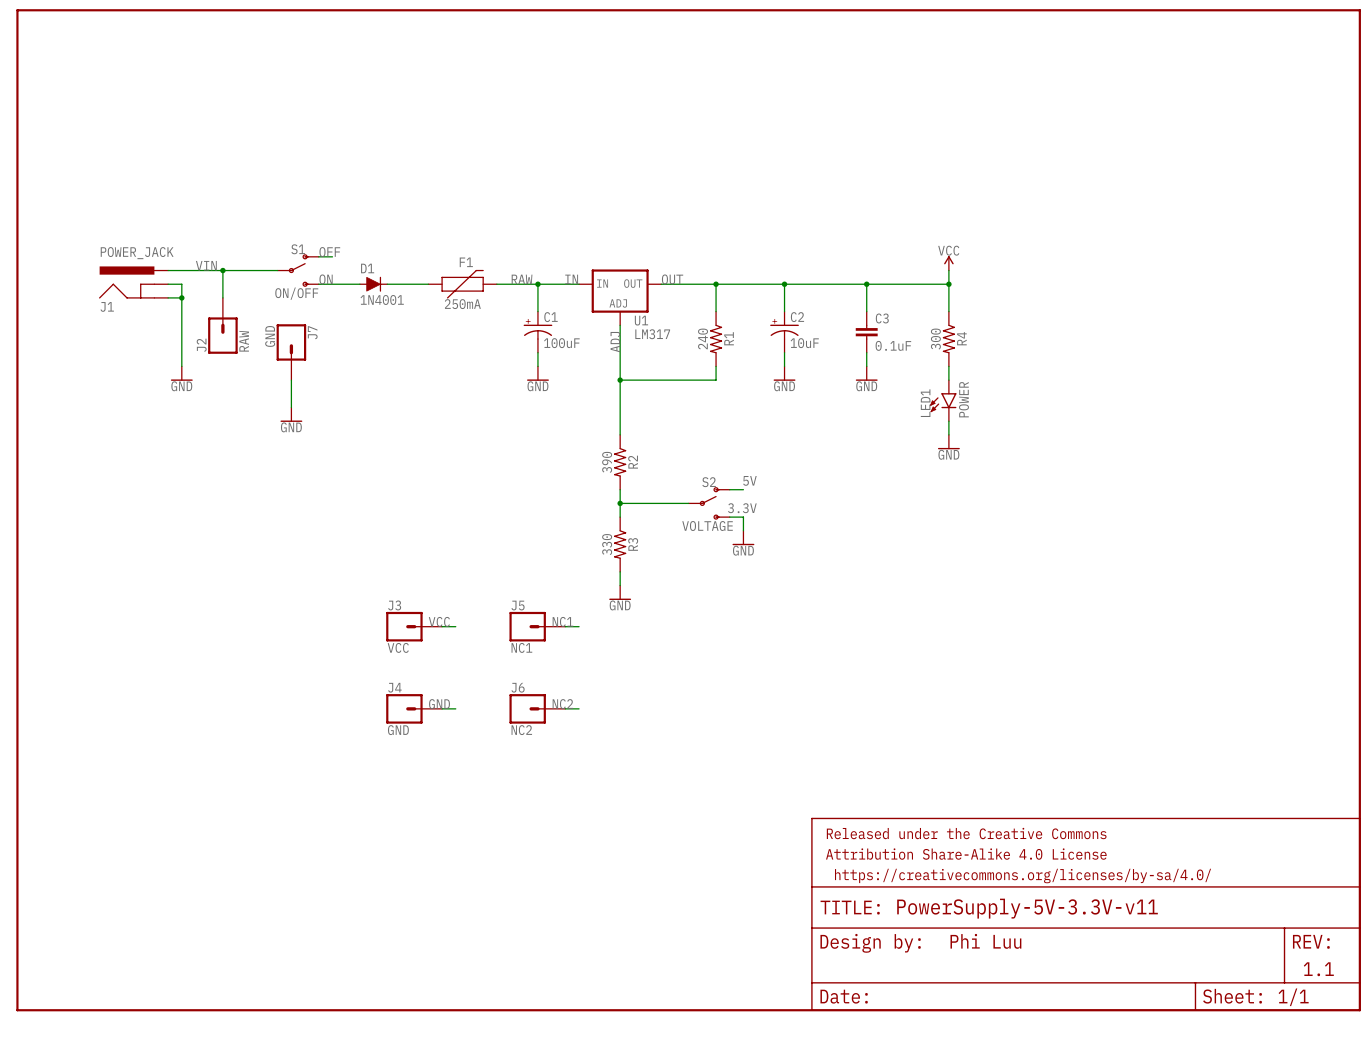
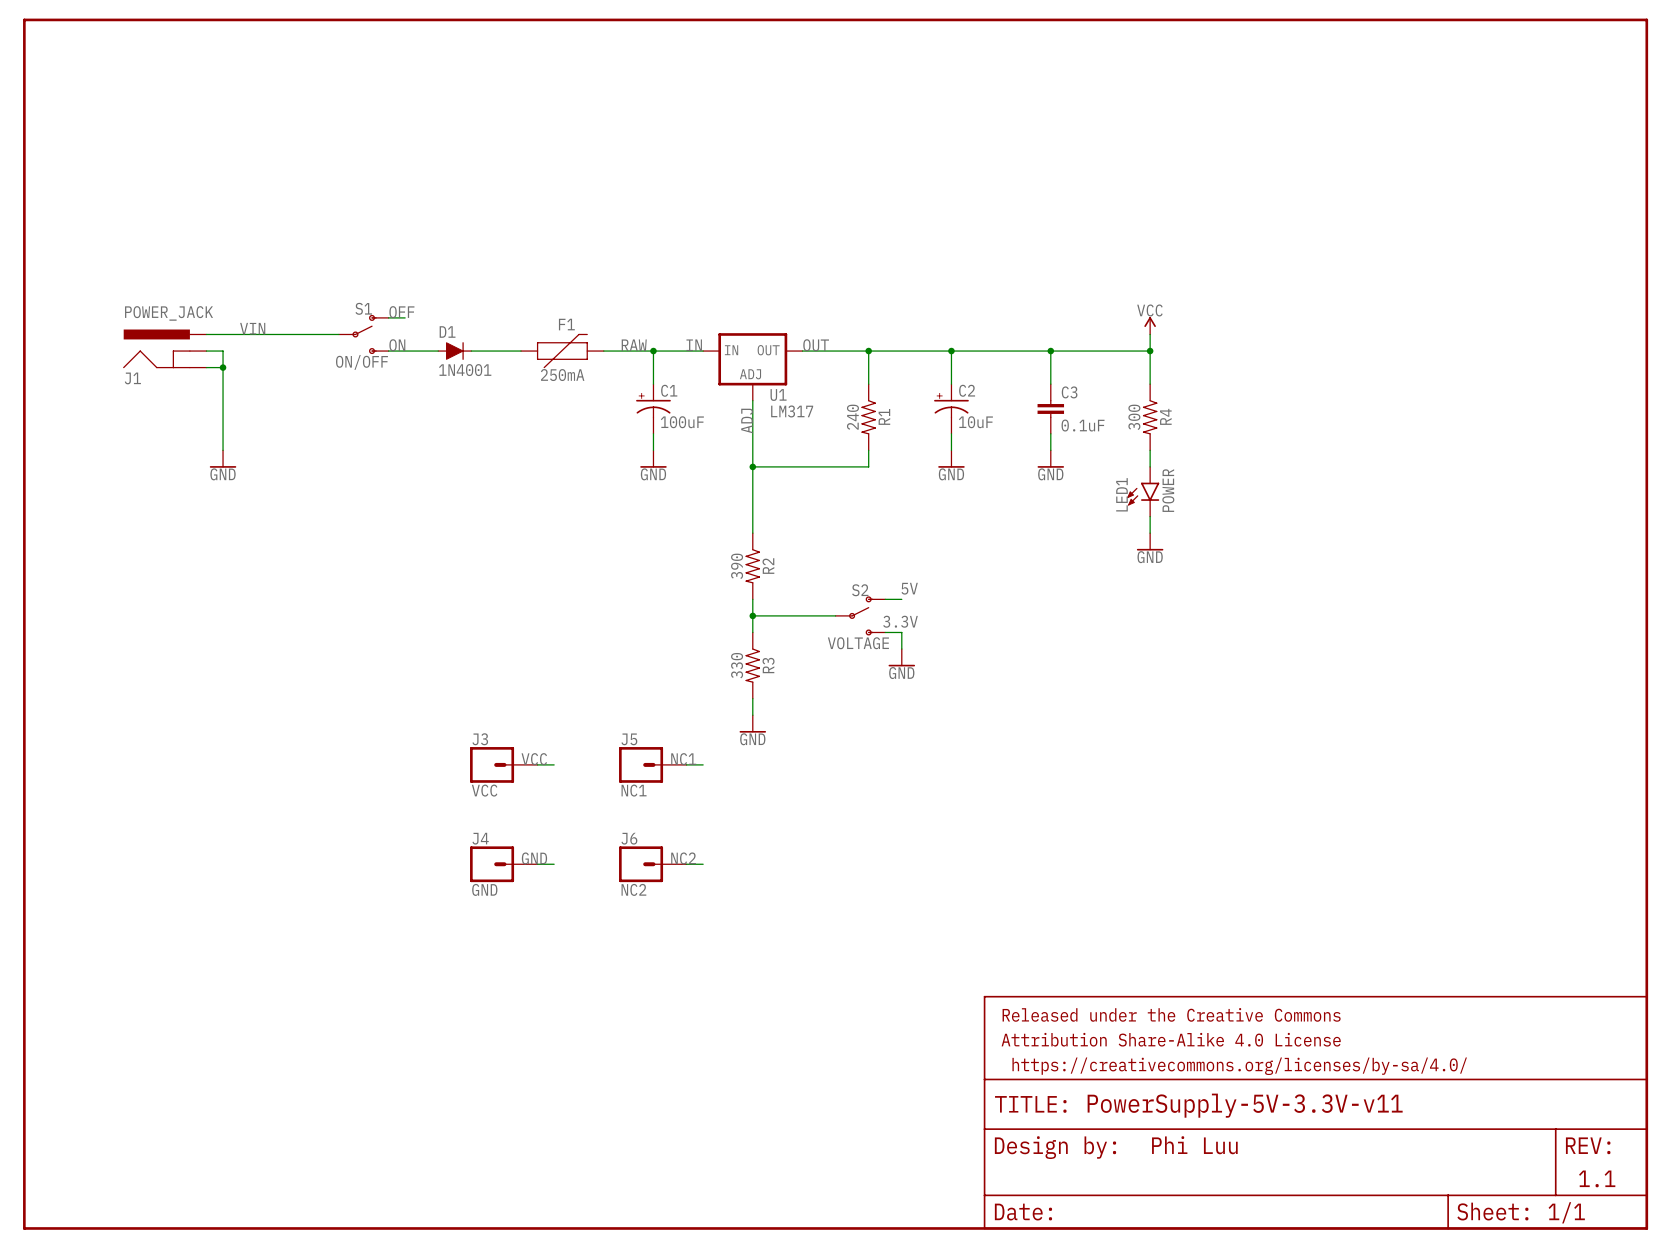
wire: (222, 270) (222, 297) -> none
junction: (222, 270) -> none
J2: RAW (222, 325) -> none
J7: GND (291, 352) -> none
wire: (291, 380) (291, 407) -> none
power symbol: GND (291, 414) -> none

